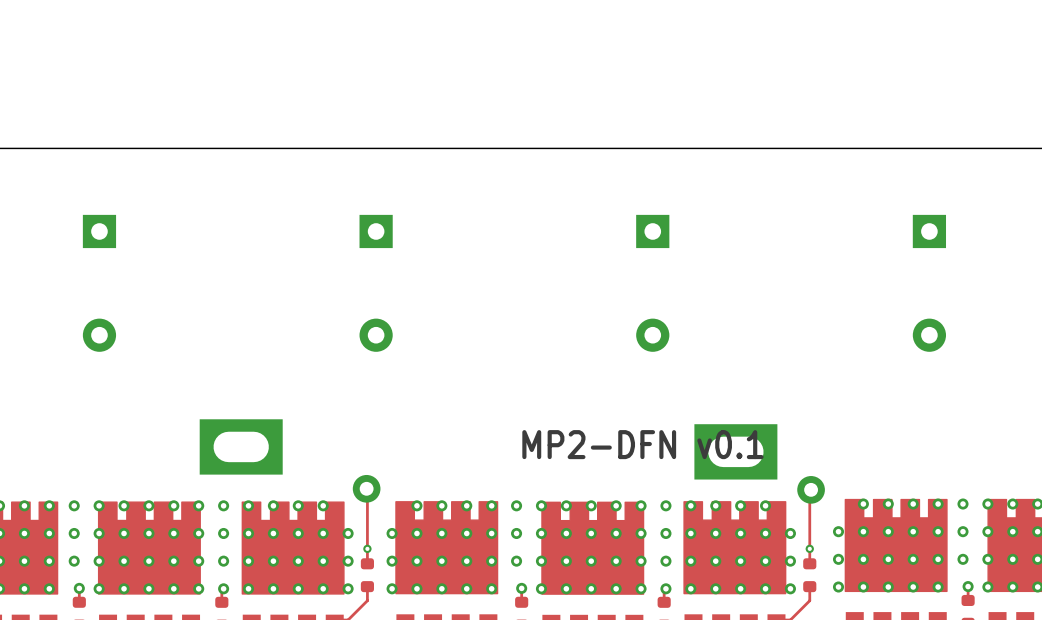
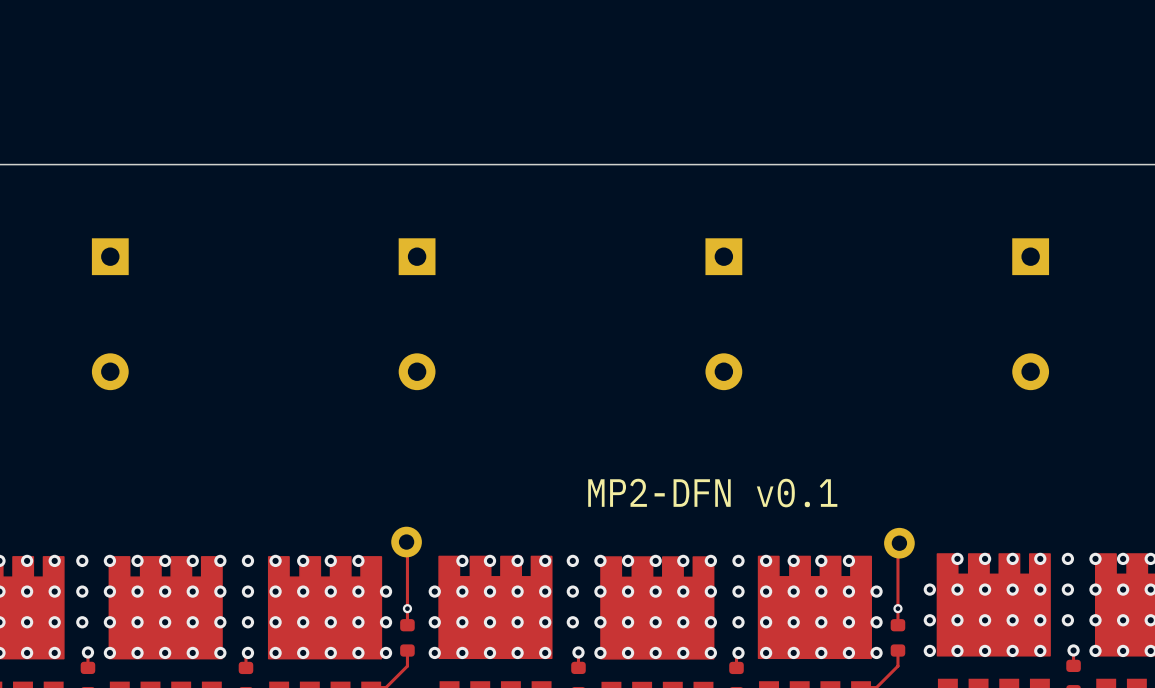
part: (241, 446) -> none
part: (735, 451) -> none

